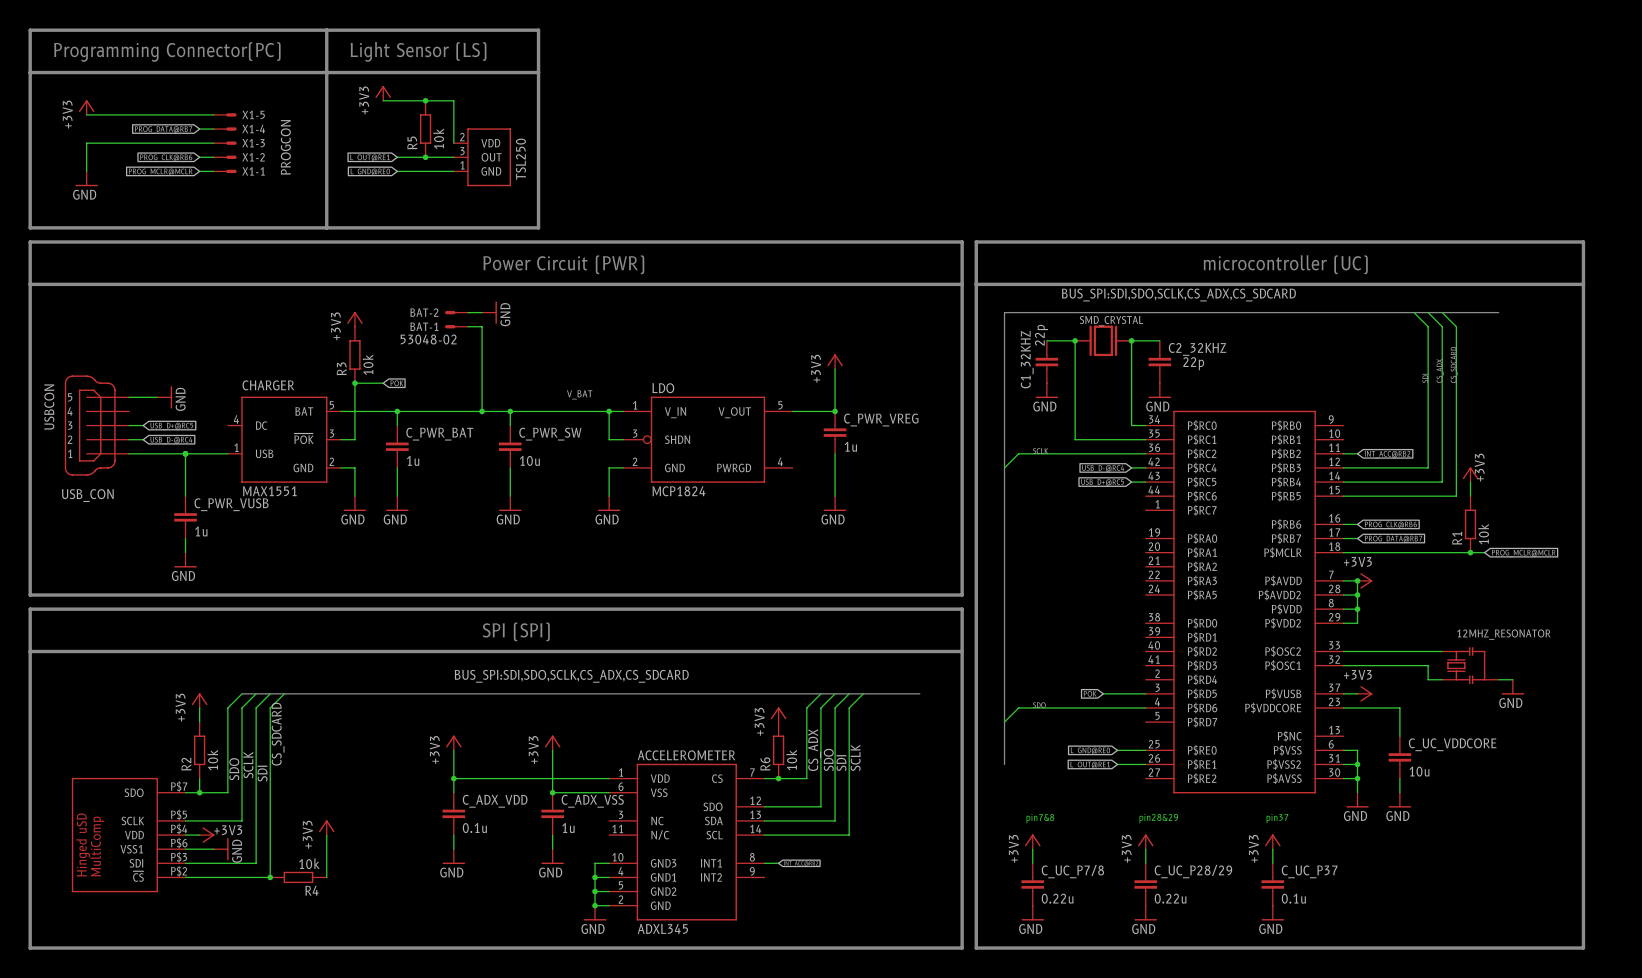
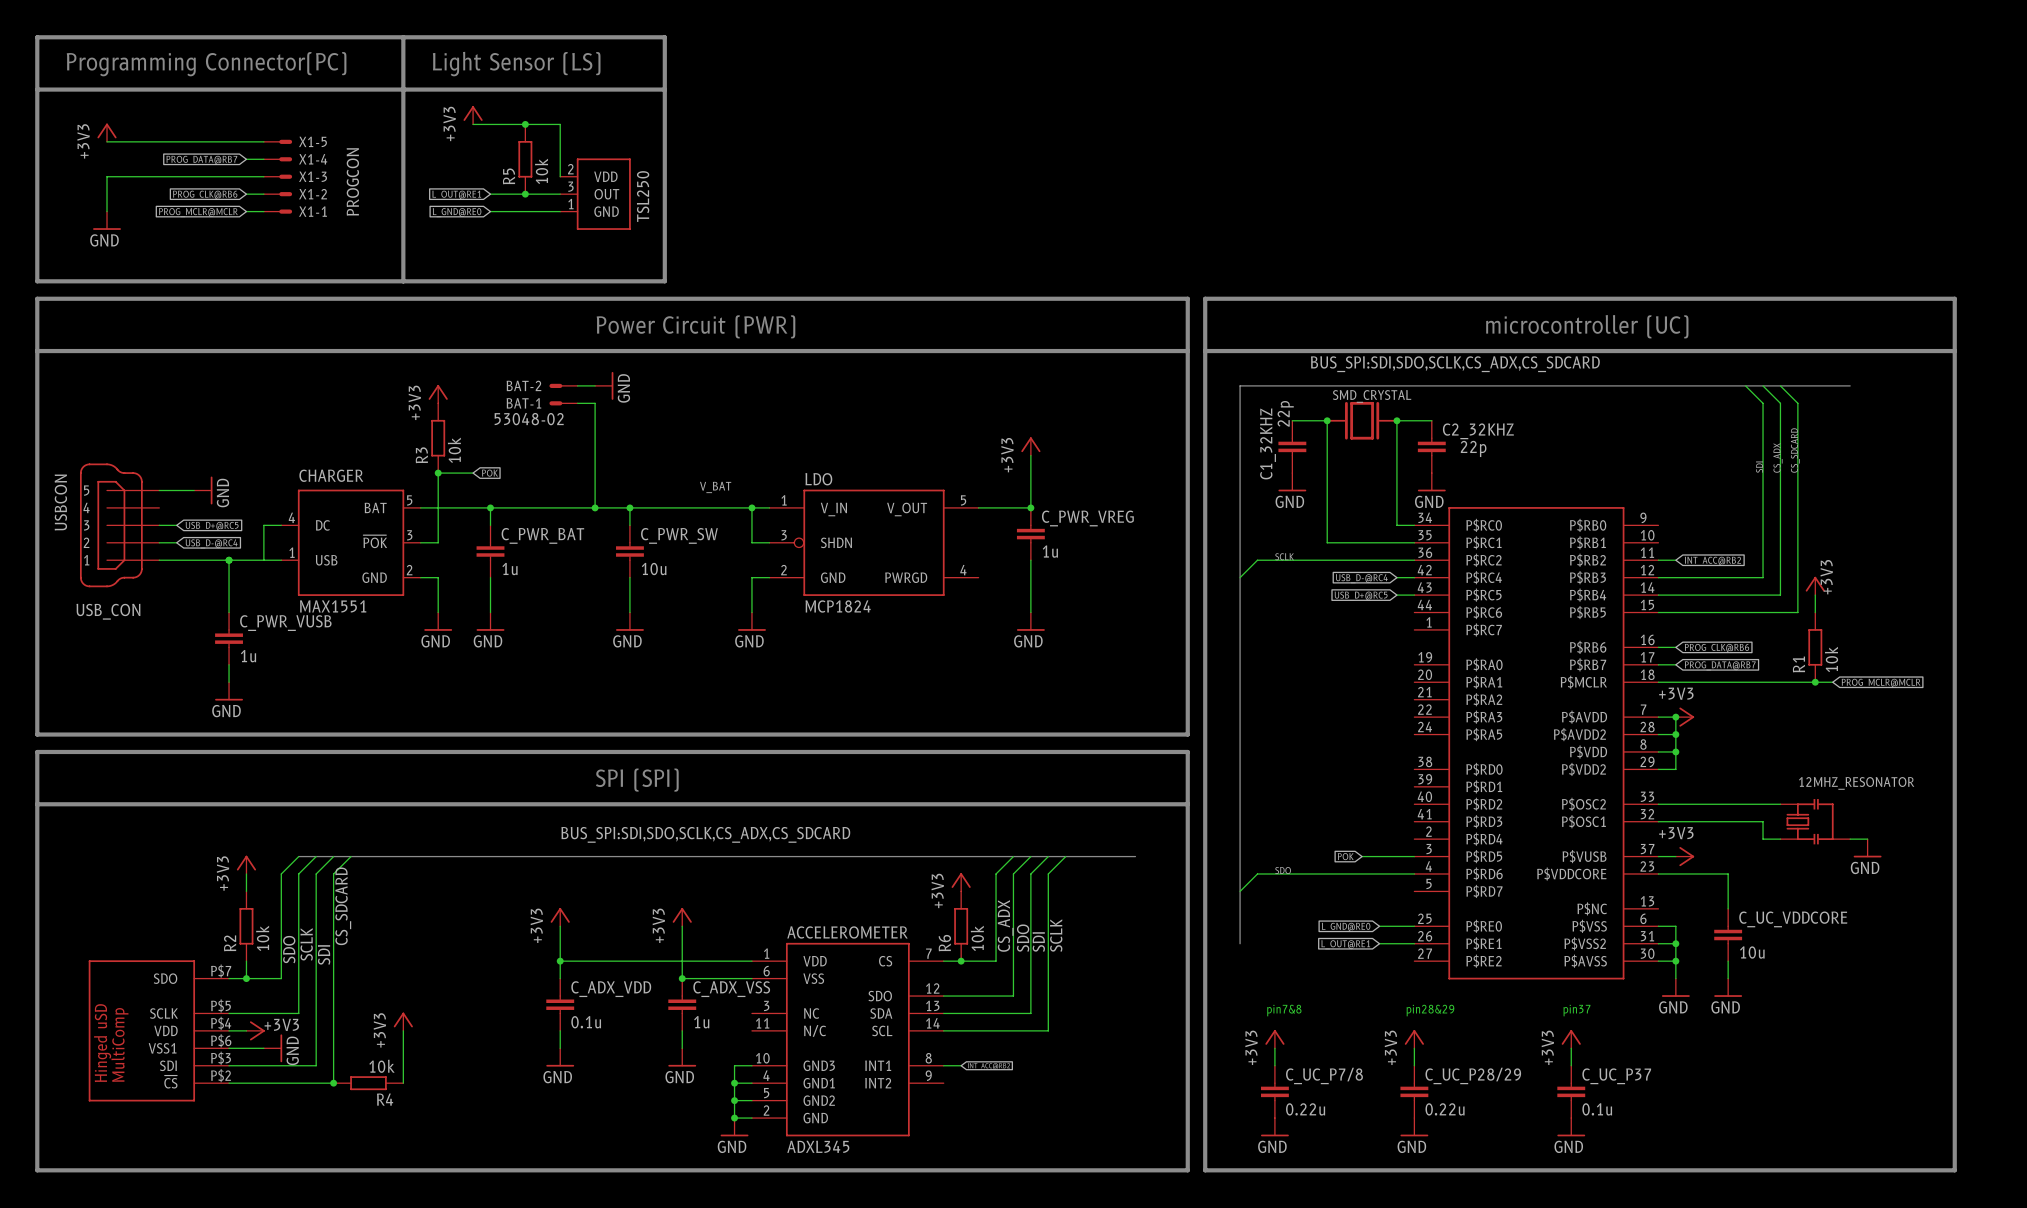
wire: none -> (281, 525) (263, 525) (263, 560)

